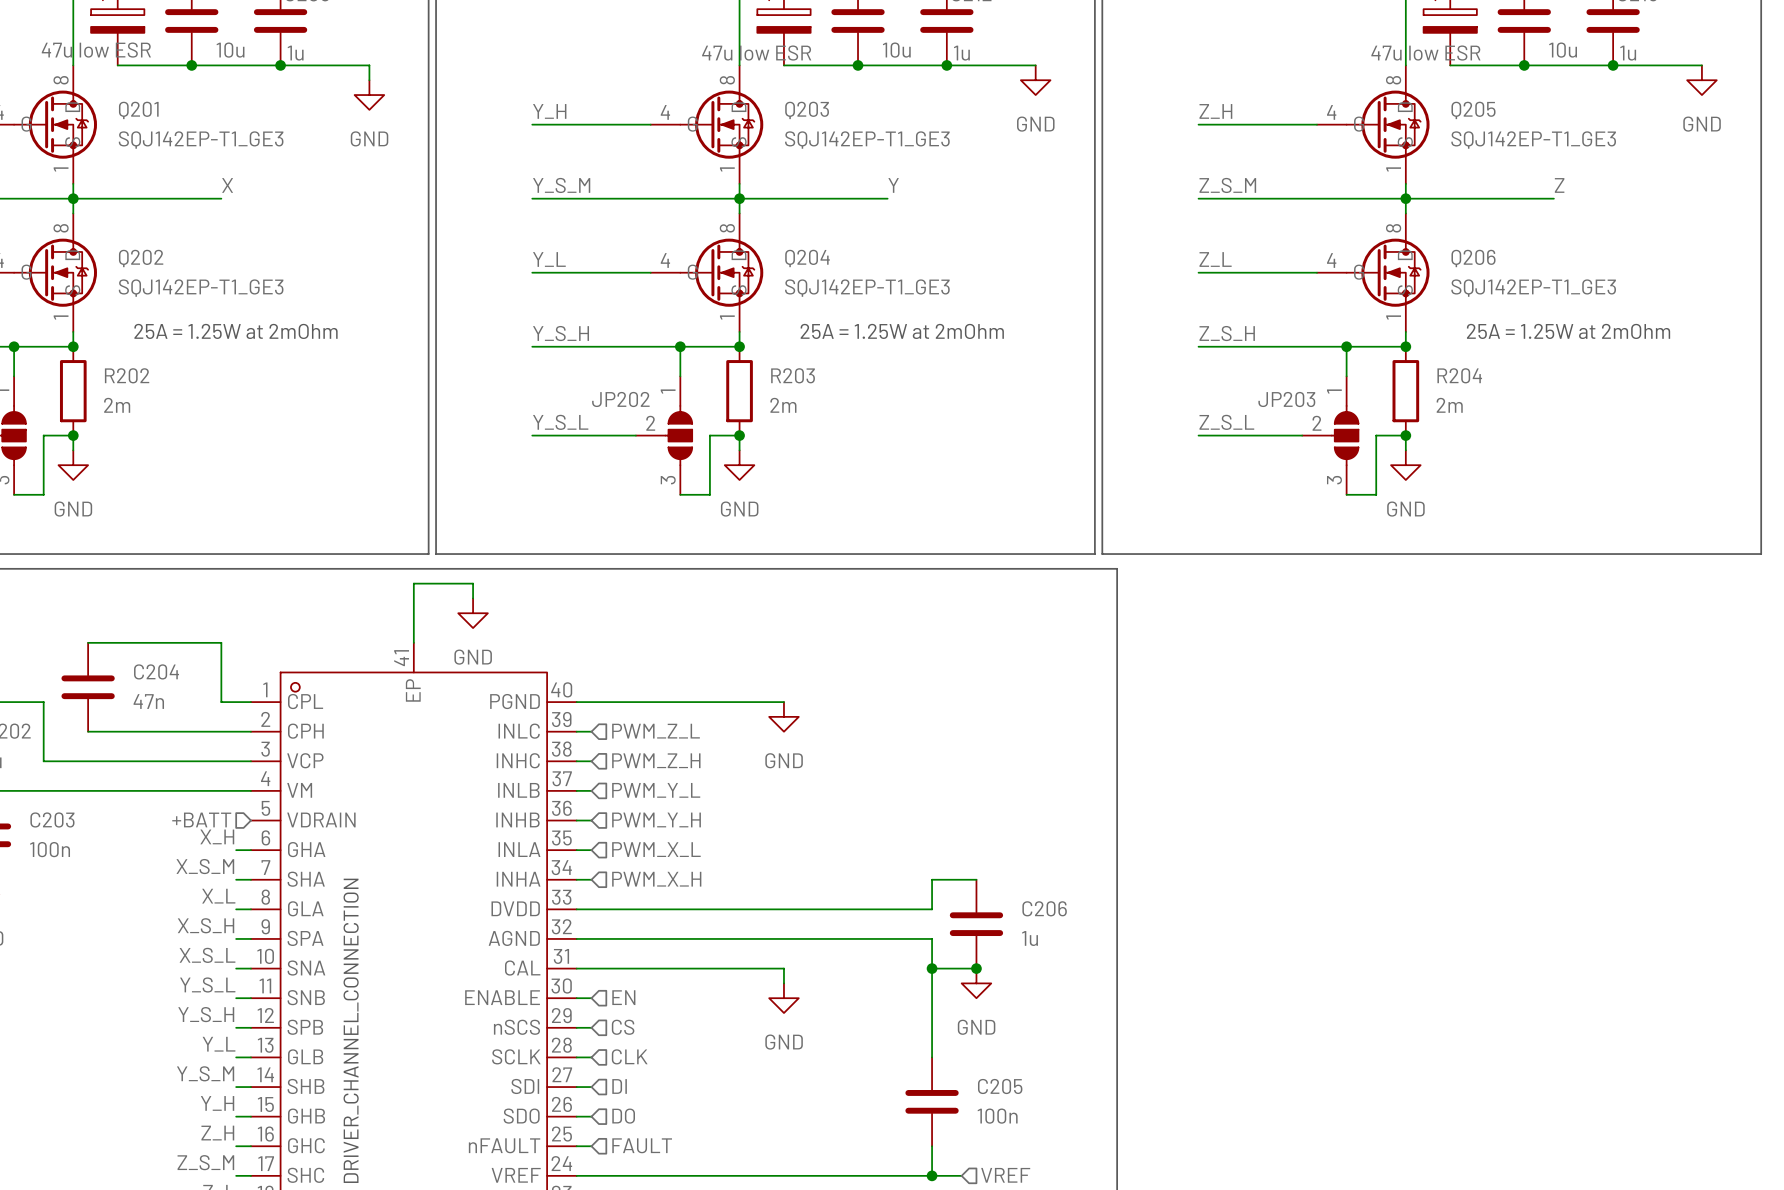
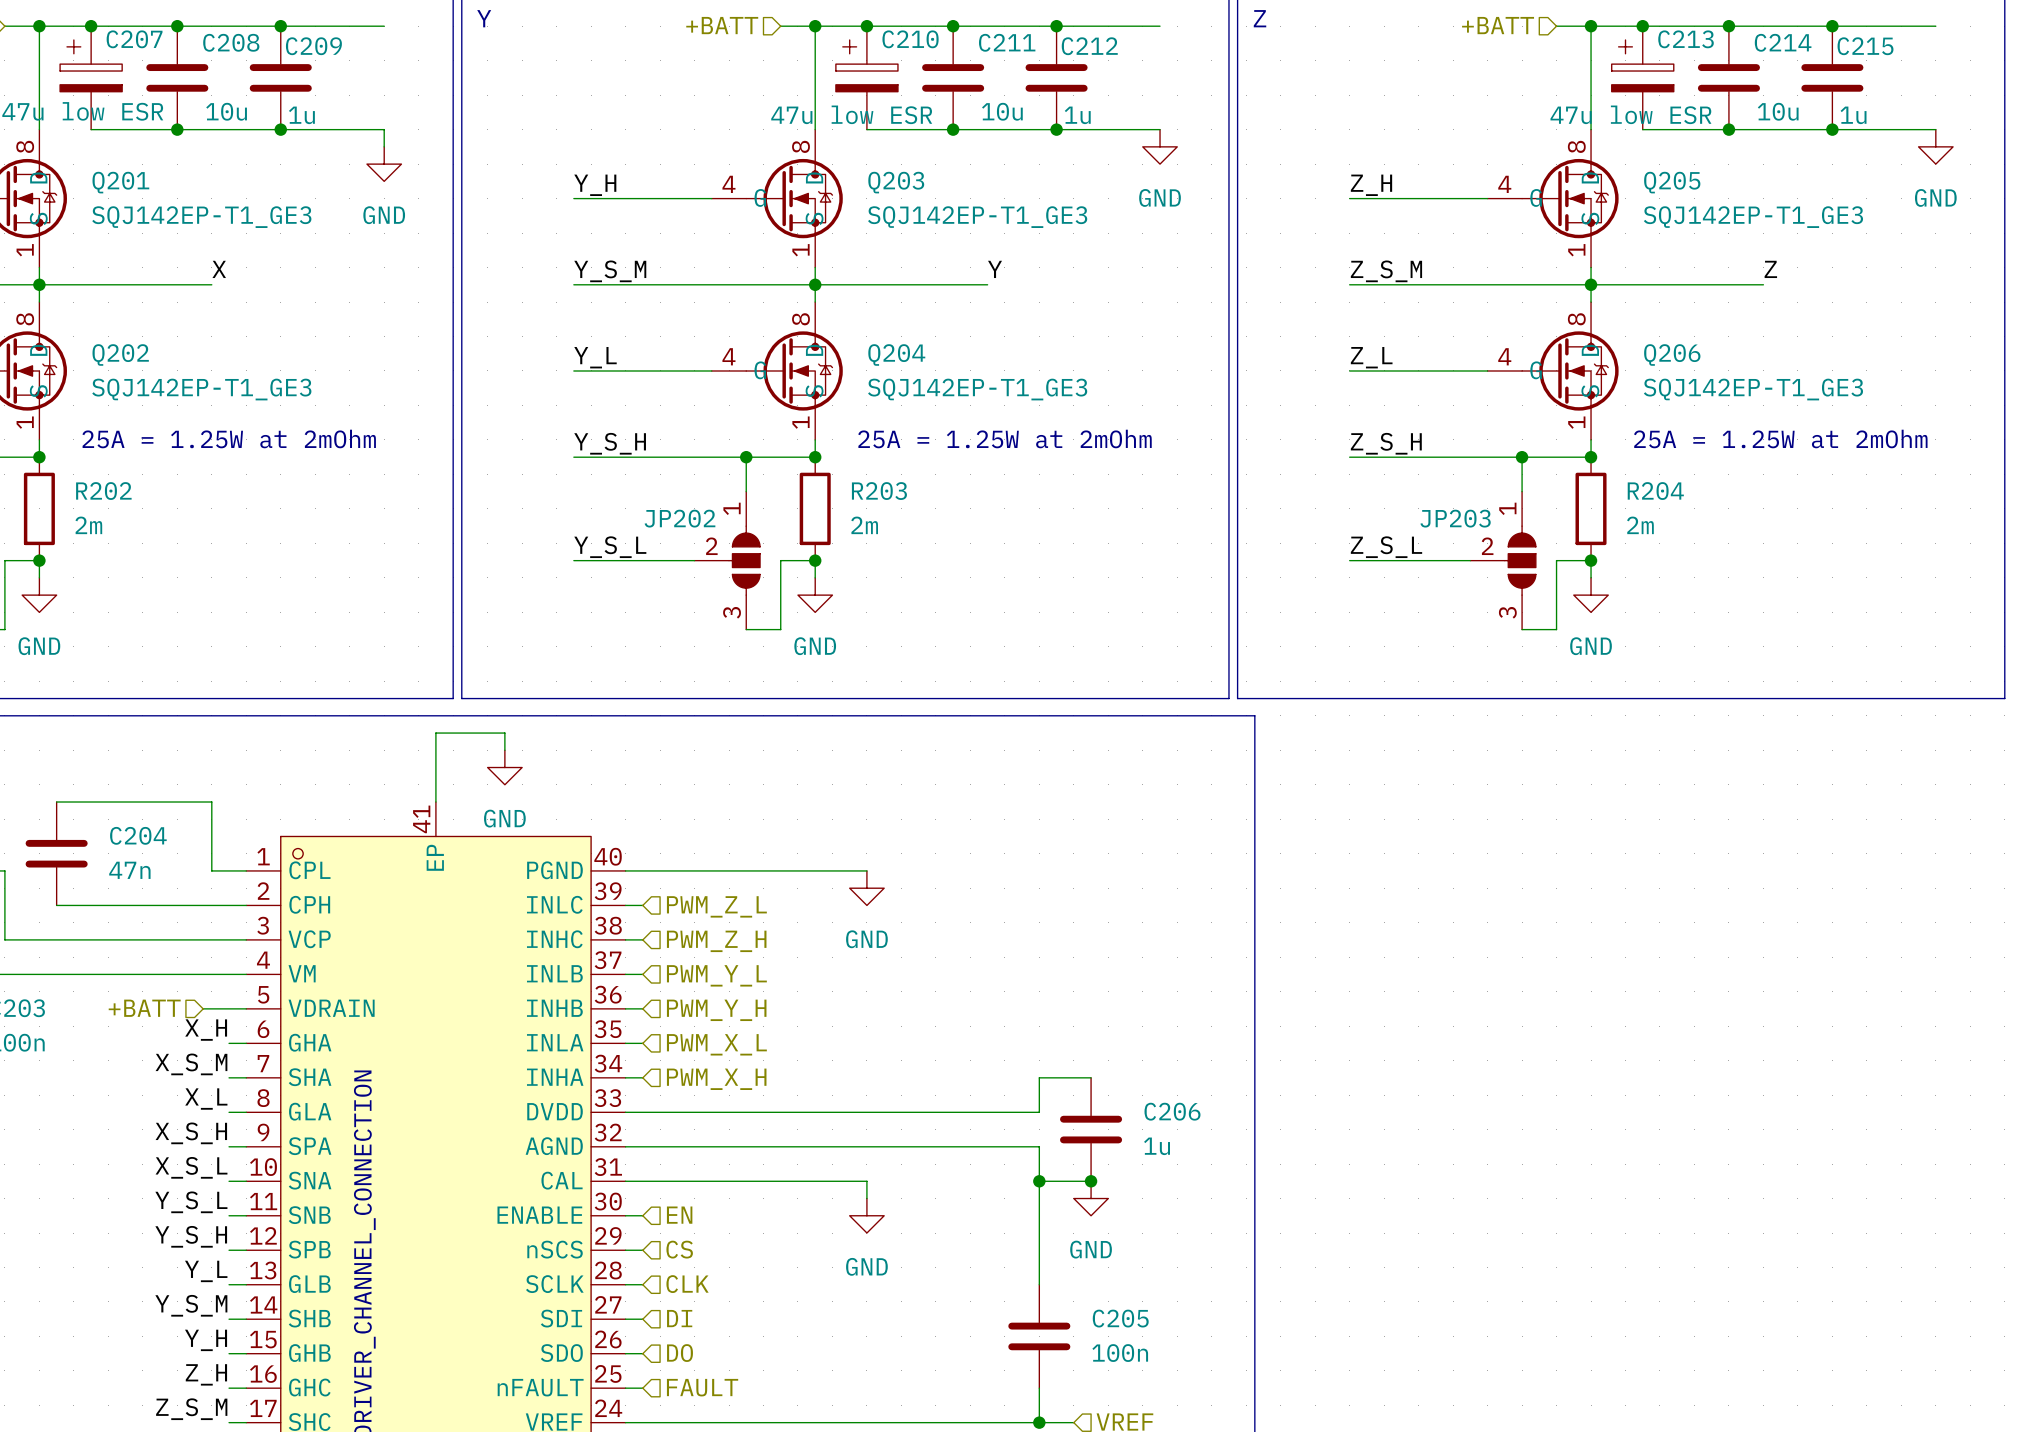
hierarchical label position: +BATT (201, 819) -> +BATT (144, 1008)
wire: none -> (203, 1008) (246, 1008)

